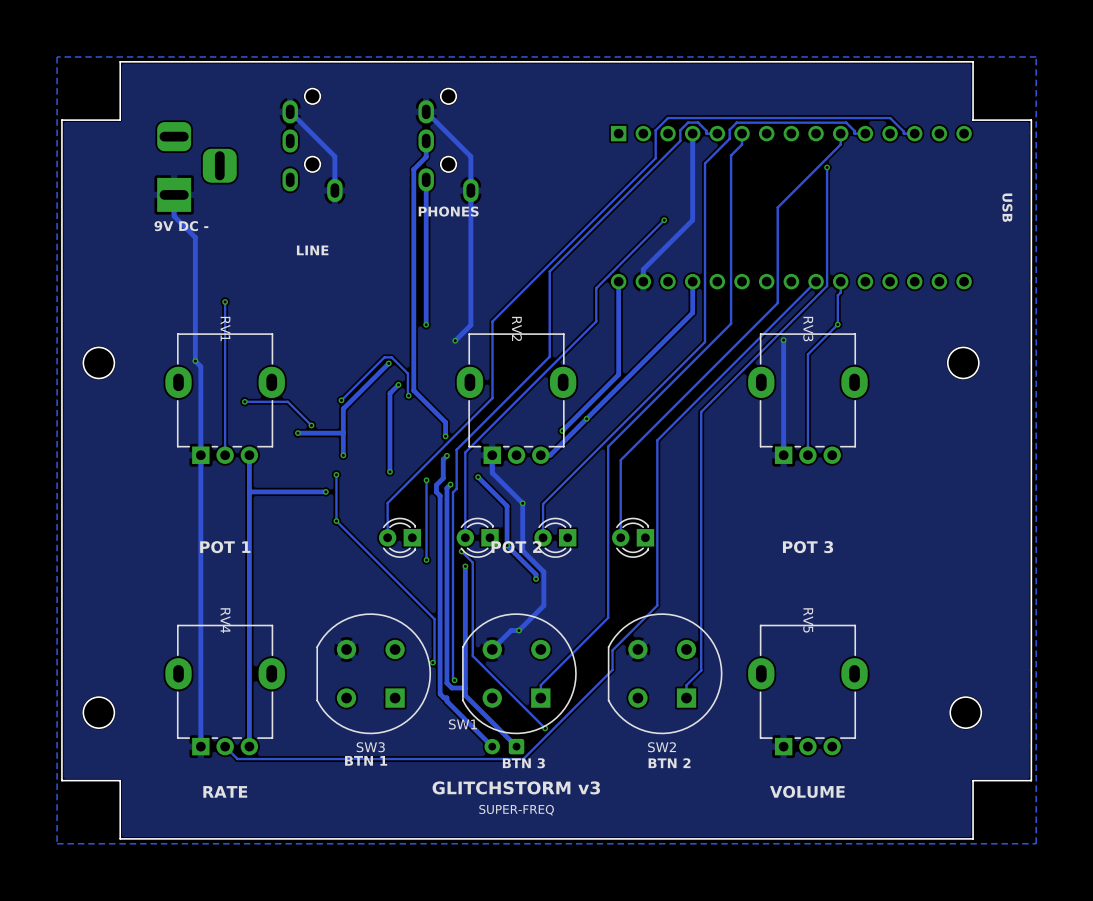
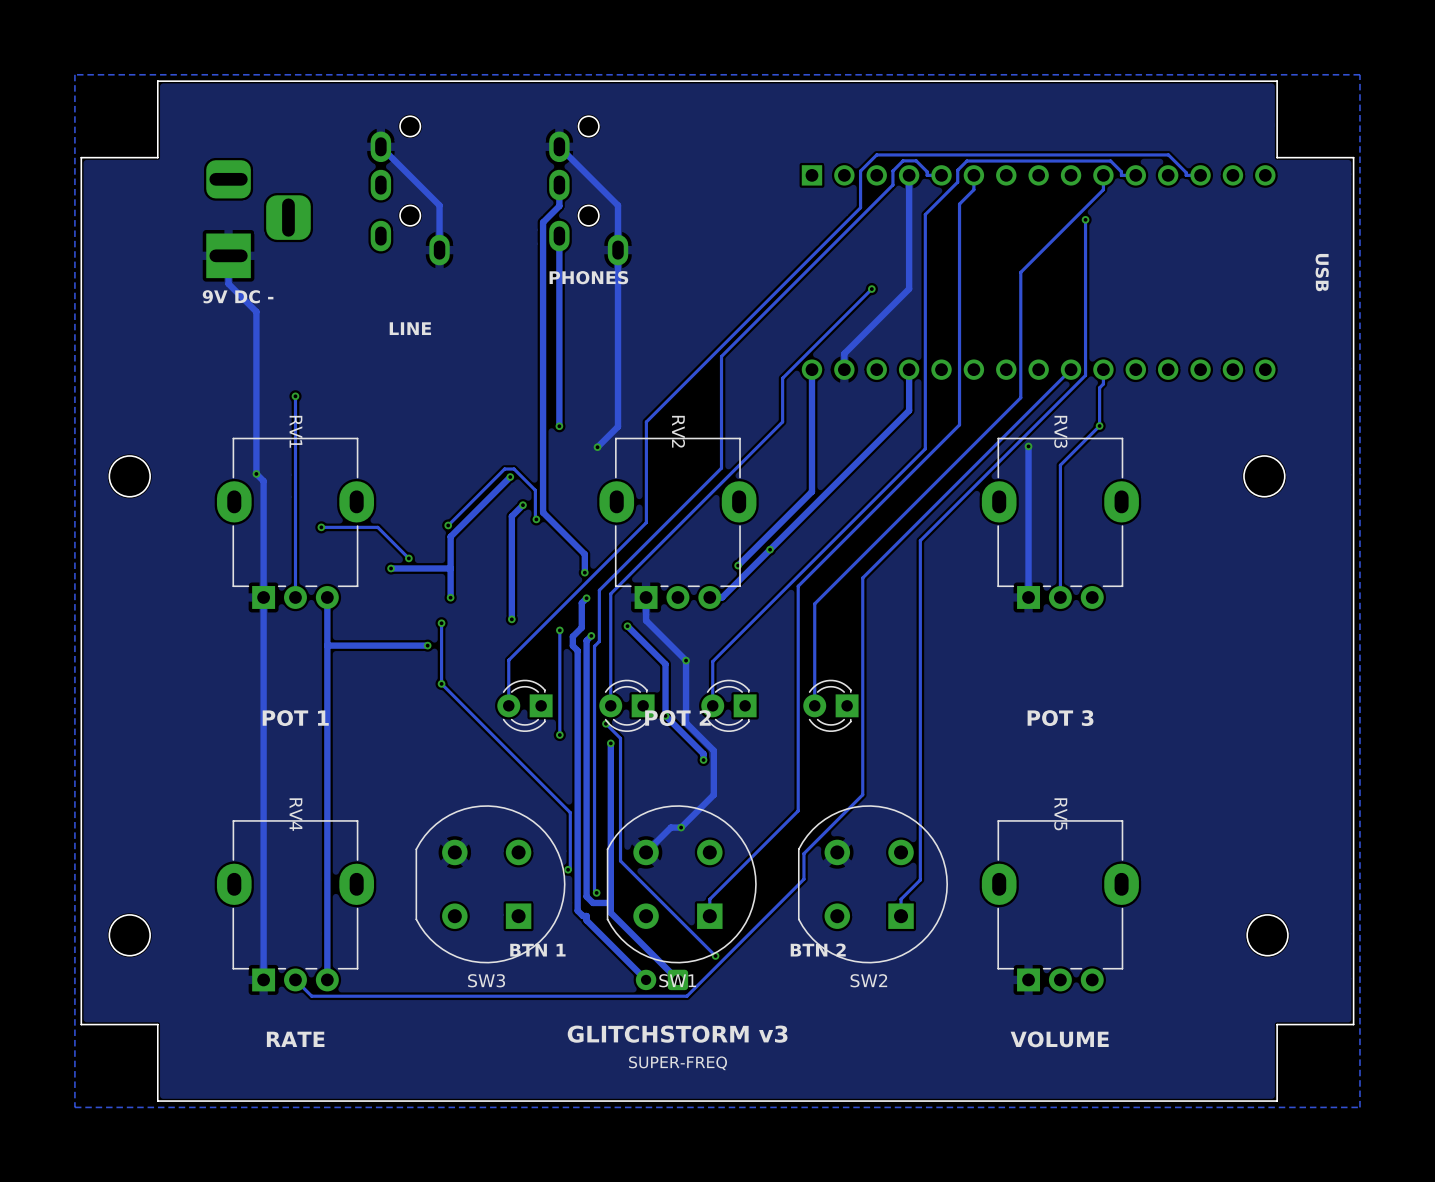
SW1 name position: SW1 (462, 724) -> SW1 (677, 980)
text position: BTN 1 (366, 760) -> BTN 1 (537, 950)
text: BTN 3 (523, 763) -> none
text position: BTN 2 (669, 763) -> BTN 2 (818, 950)

